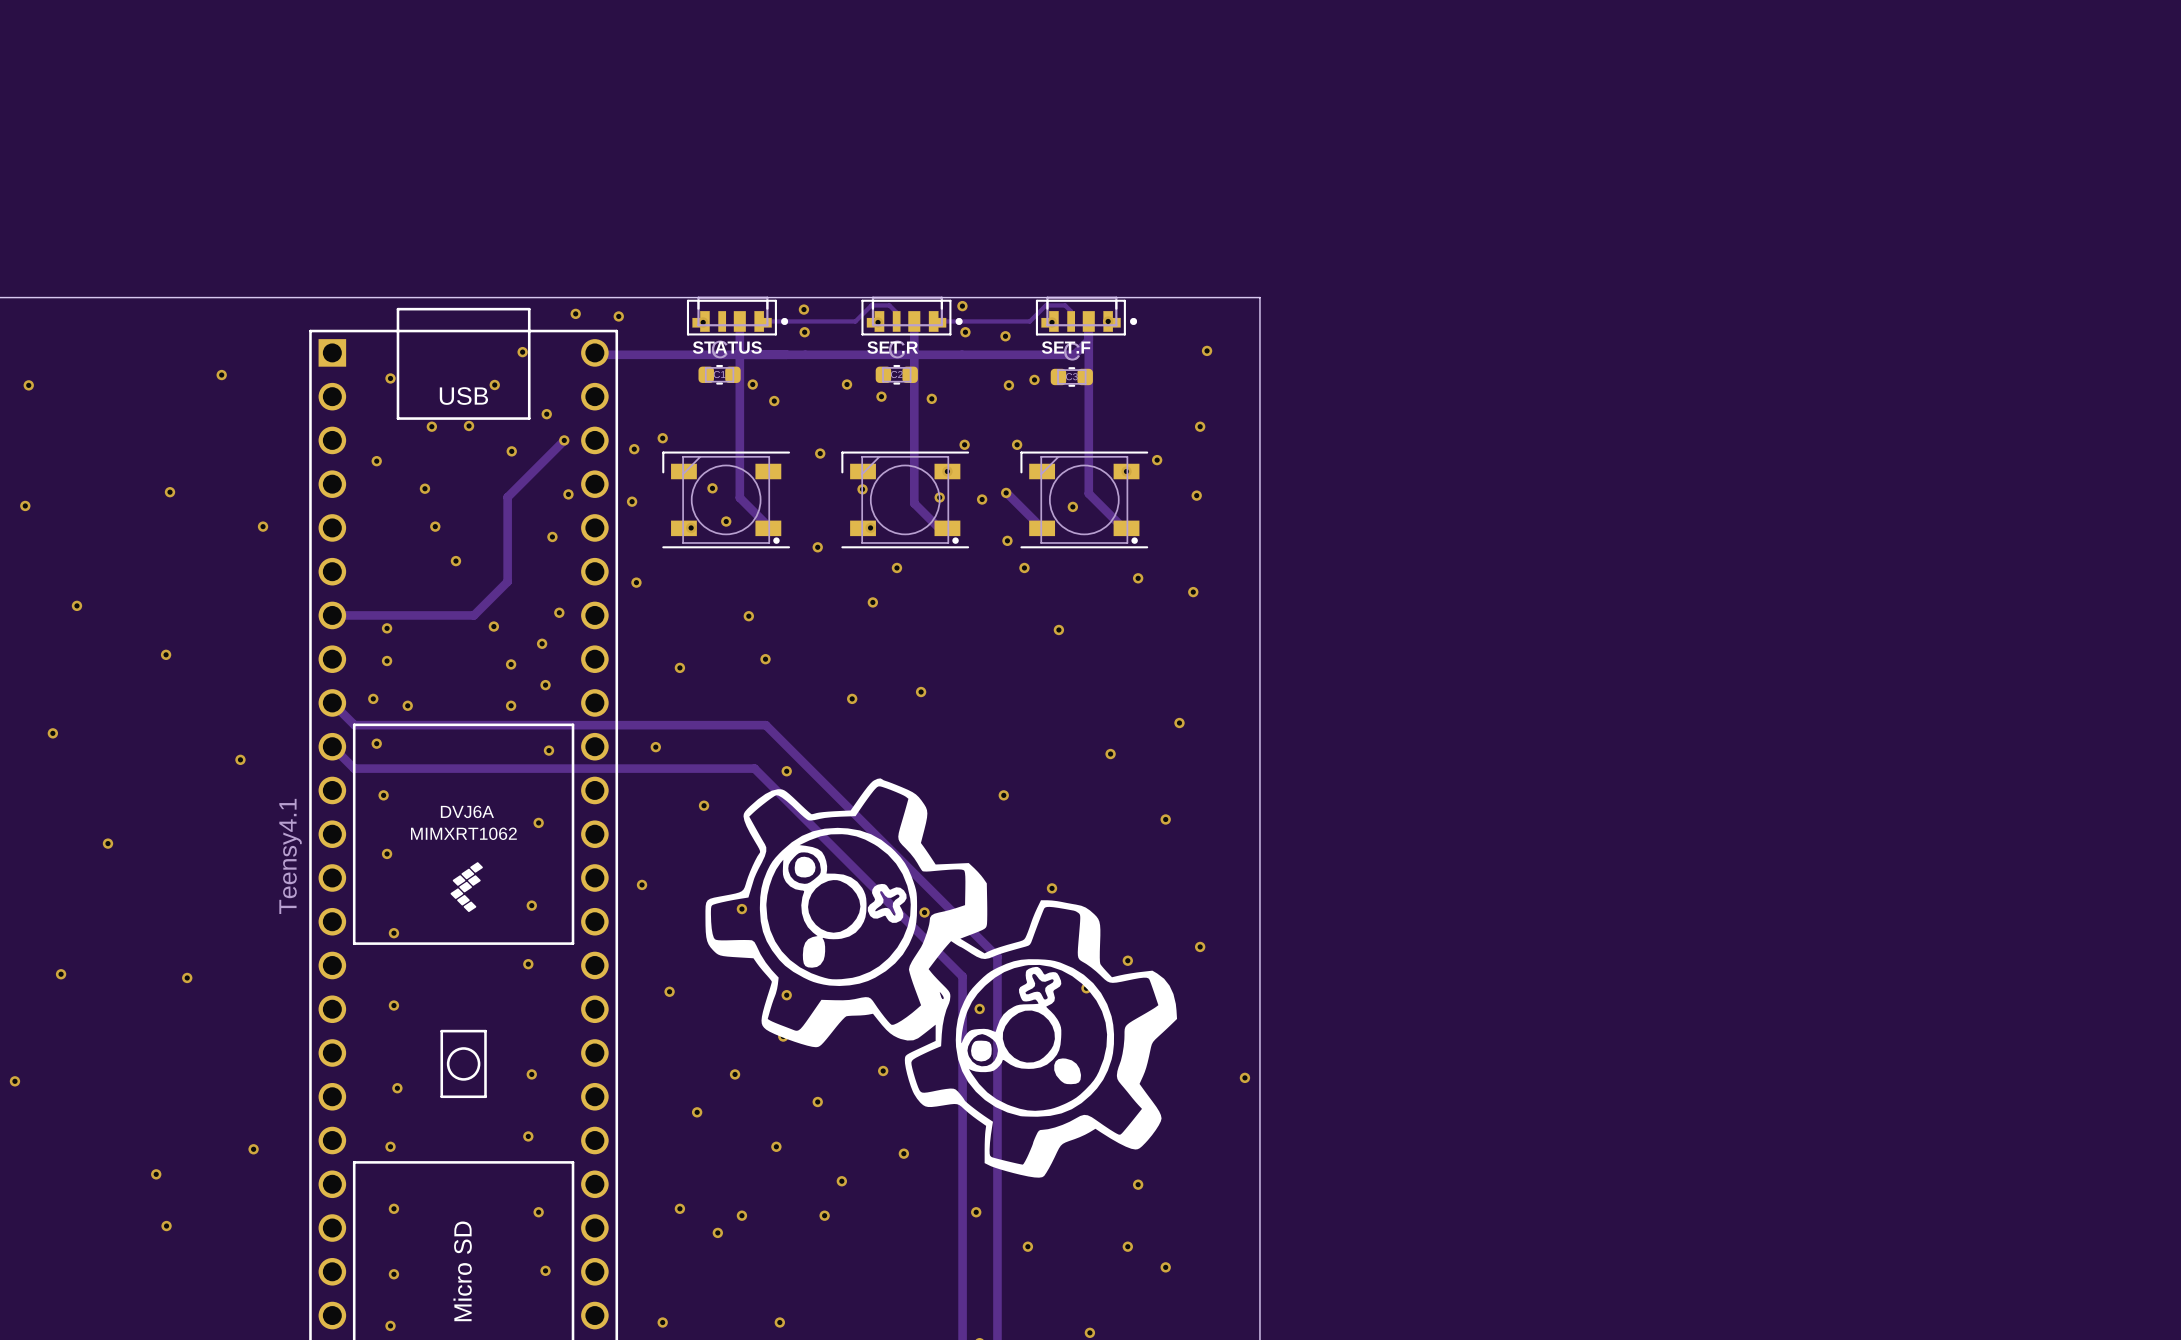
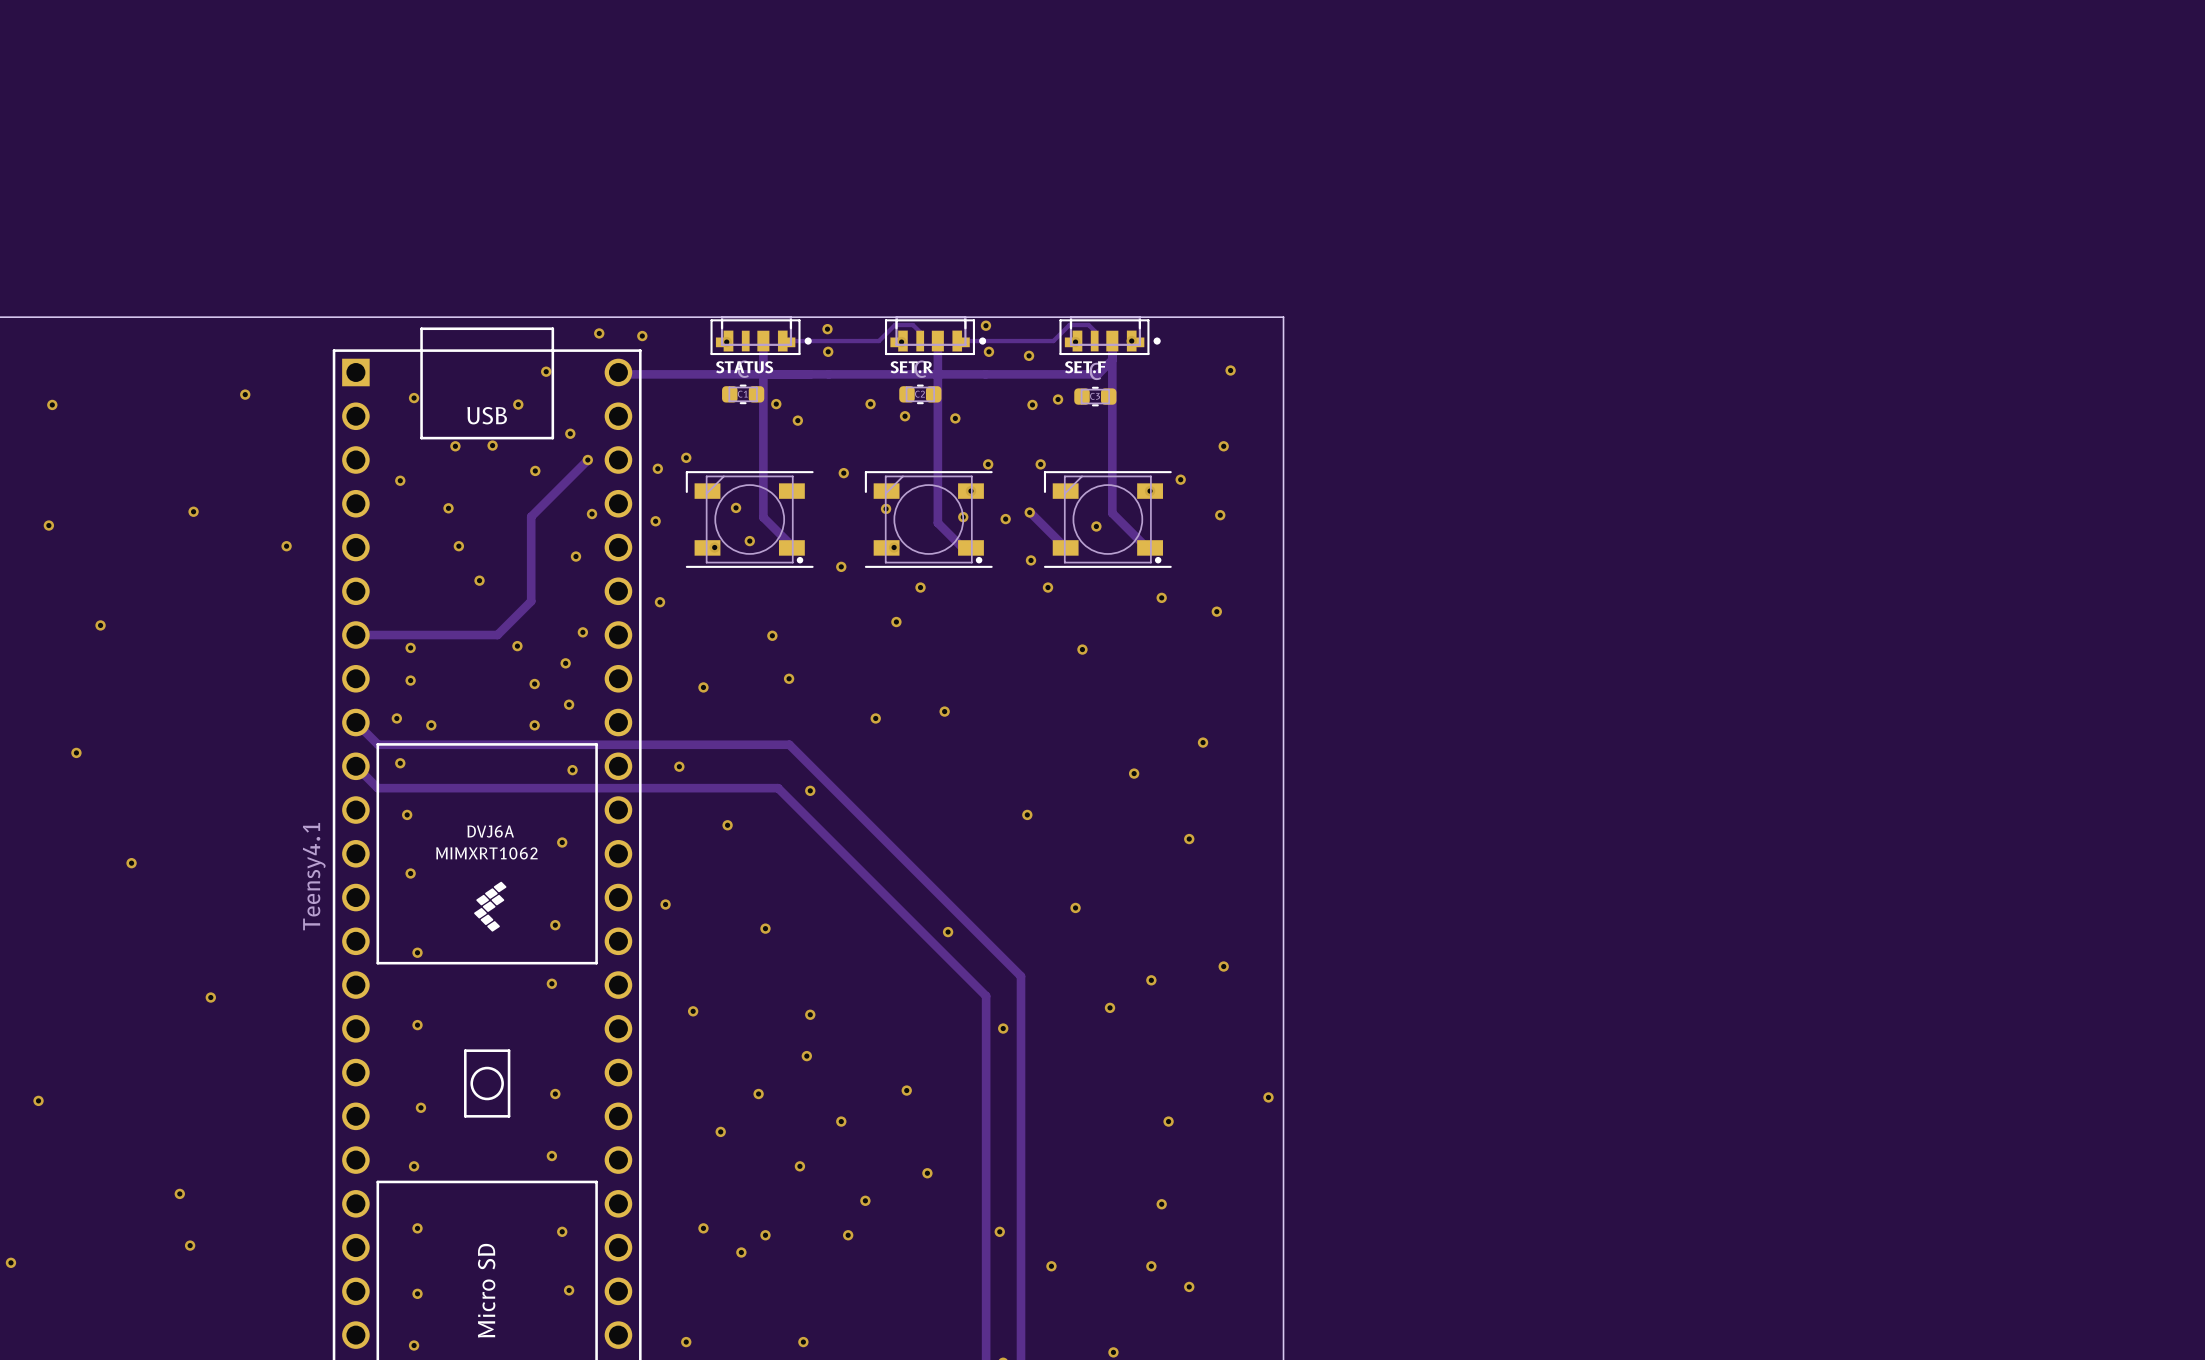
via: (166, 654) -> none
via: (240, 759) -> none
drawing: [705, 778, 1178, 1178] -> none
via: (61, 974) -> none
via: (253, 1149) -> none

